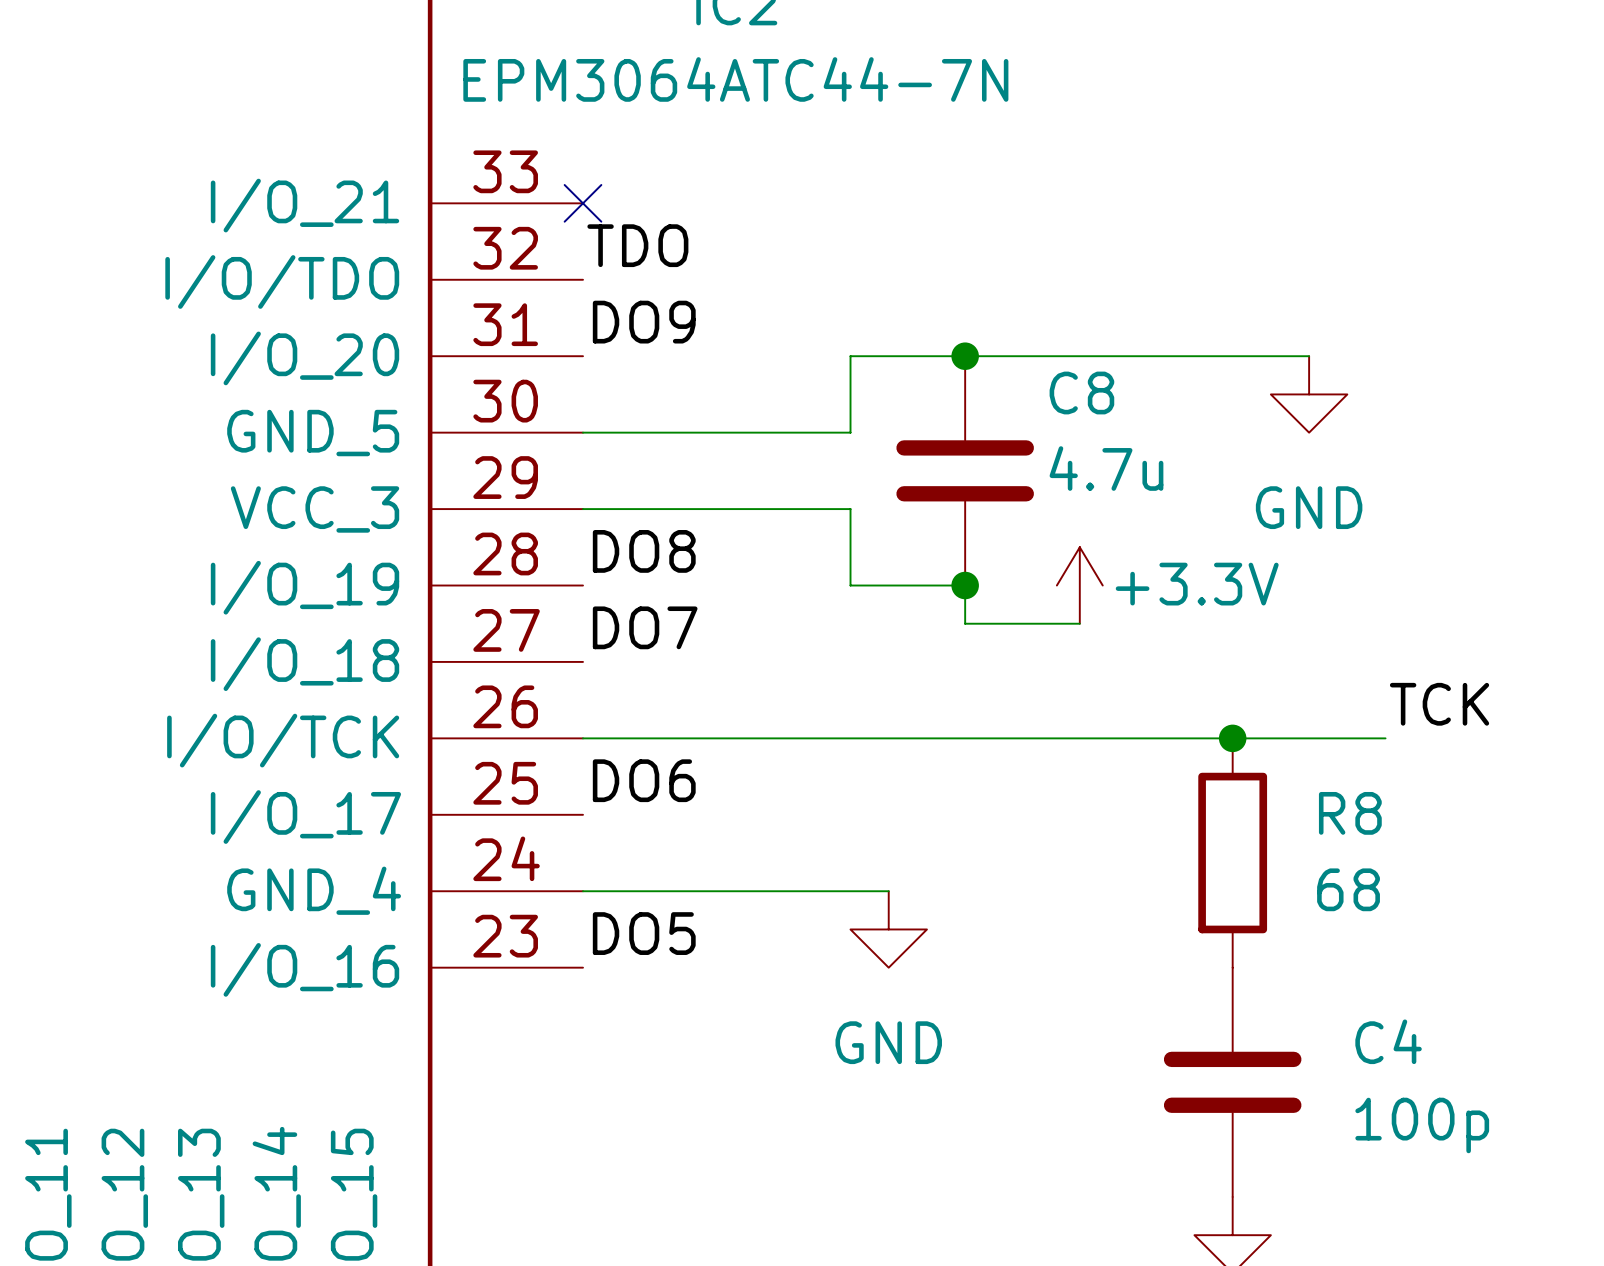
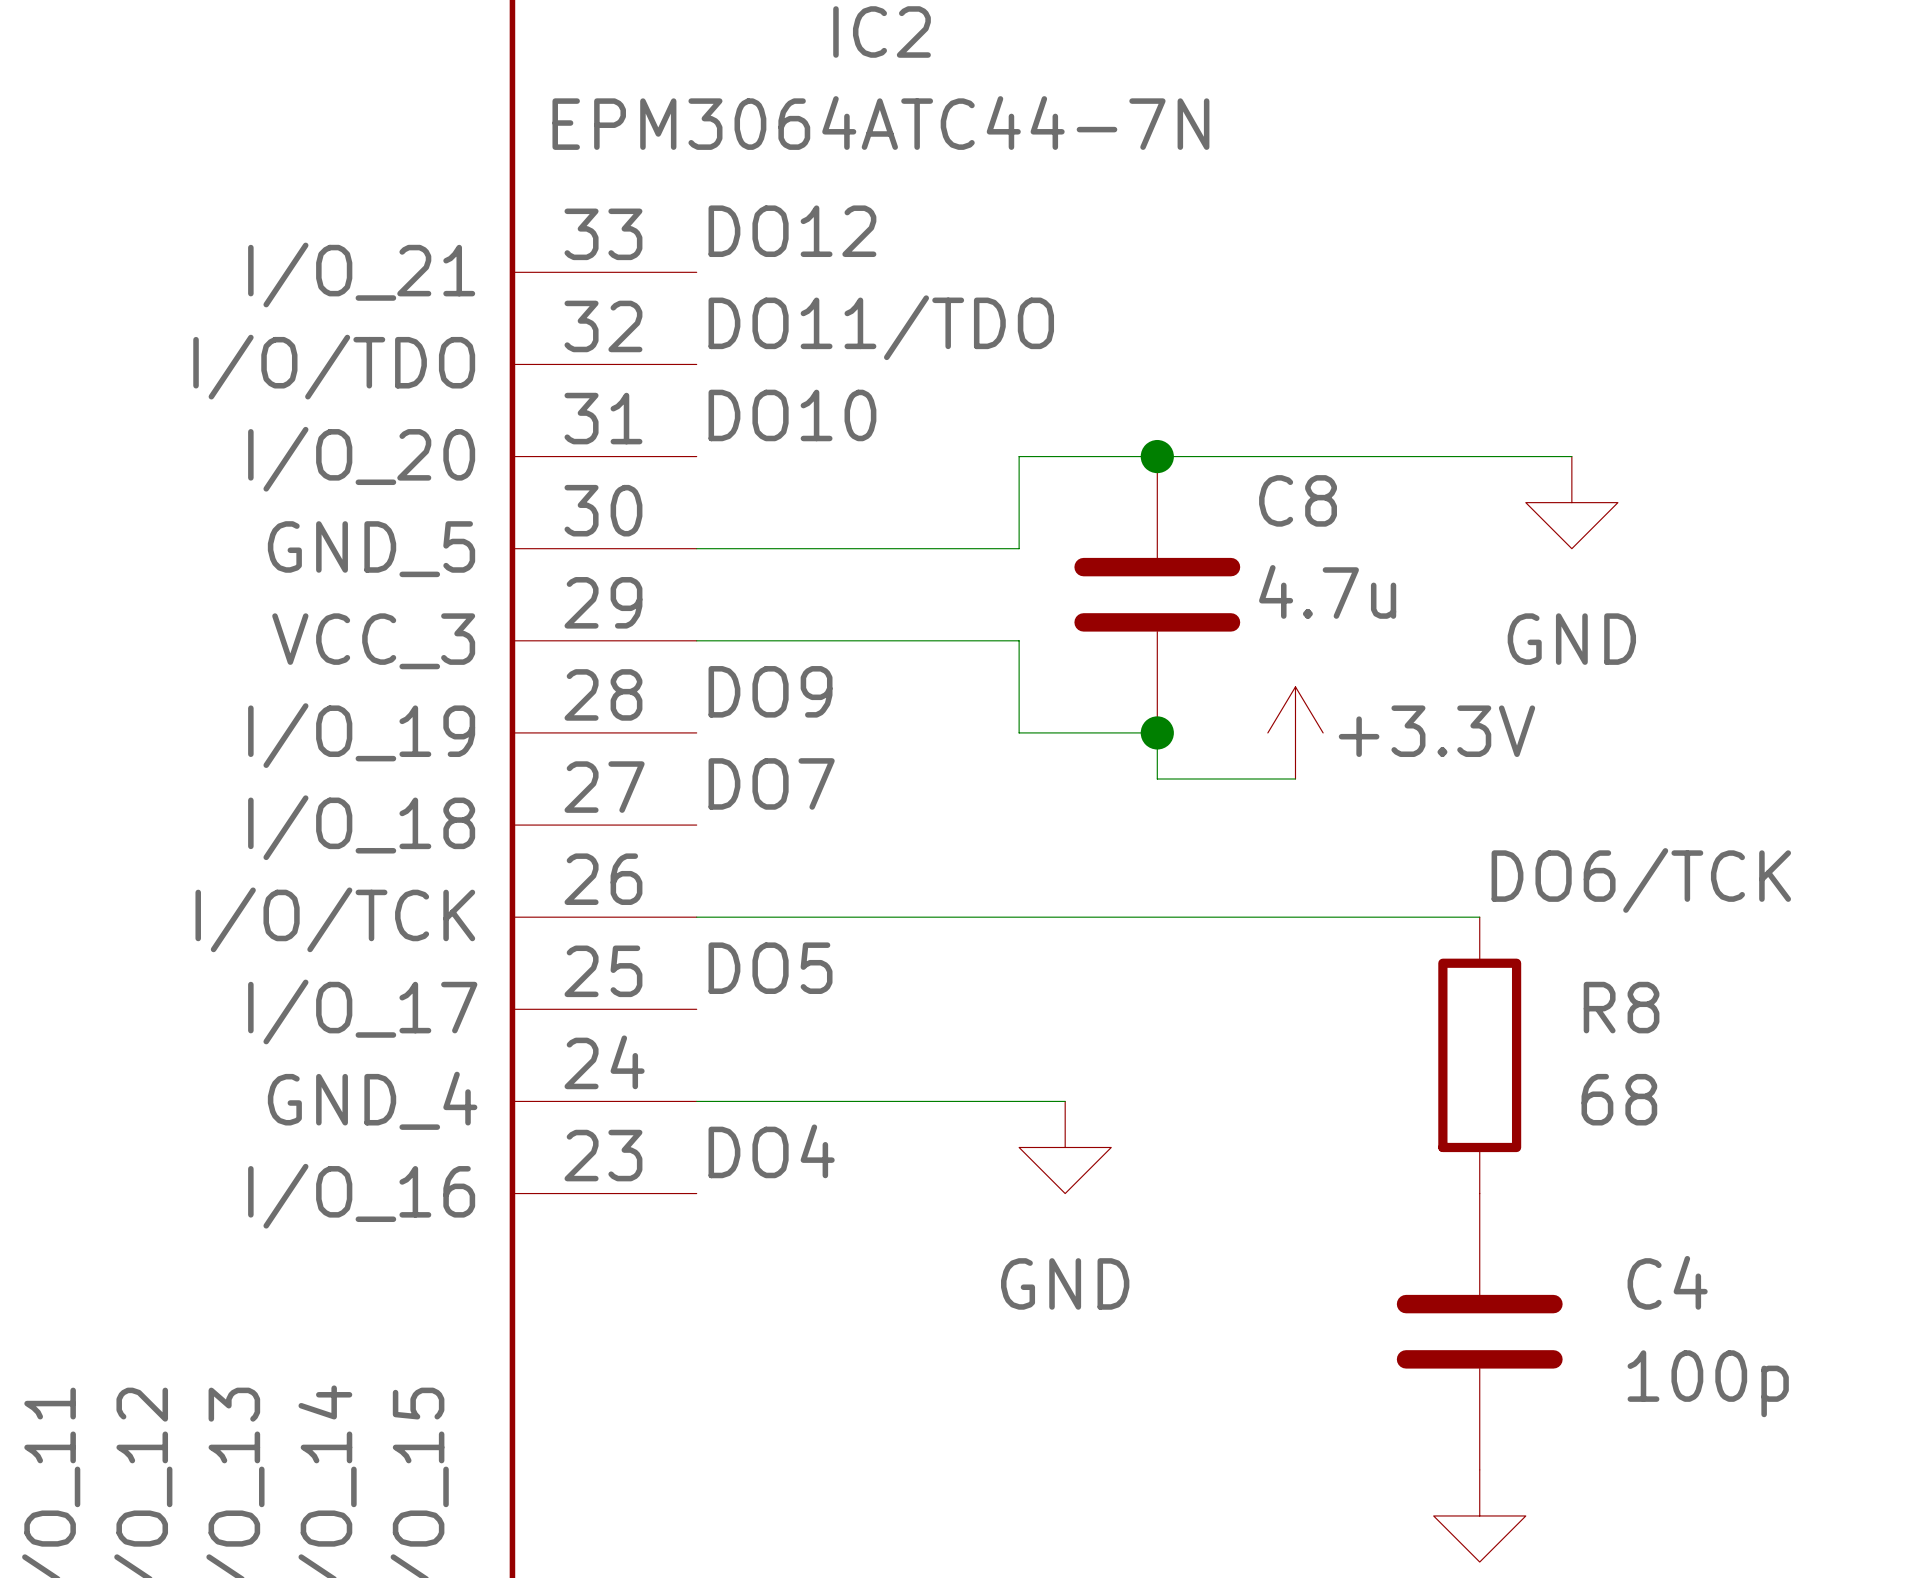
label: none -> DO12 (792, 231)
no-connect mark: (583, 203) -> none
label: TDO (637, 245) -> DO11/TDO (881, 327)
label: DO9 (644, 322) -> DO10 (792, 415)
label: DO8 (644, 551) -> DO9 (770, 691)
label: TCK (1439, 704) -> none
label: none -> DO6/TCK (1641, 880)
wire: (1232, 738) (1385, 738) -> none
junction: (1232, 738) -> none
label: DO6 (644, 780) -> DO5 (770, 968)
label: DO5 (644, 933) -> DO4 (771, 1151)

